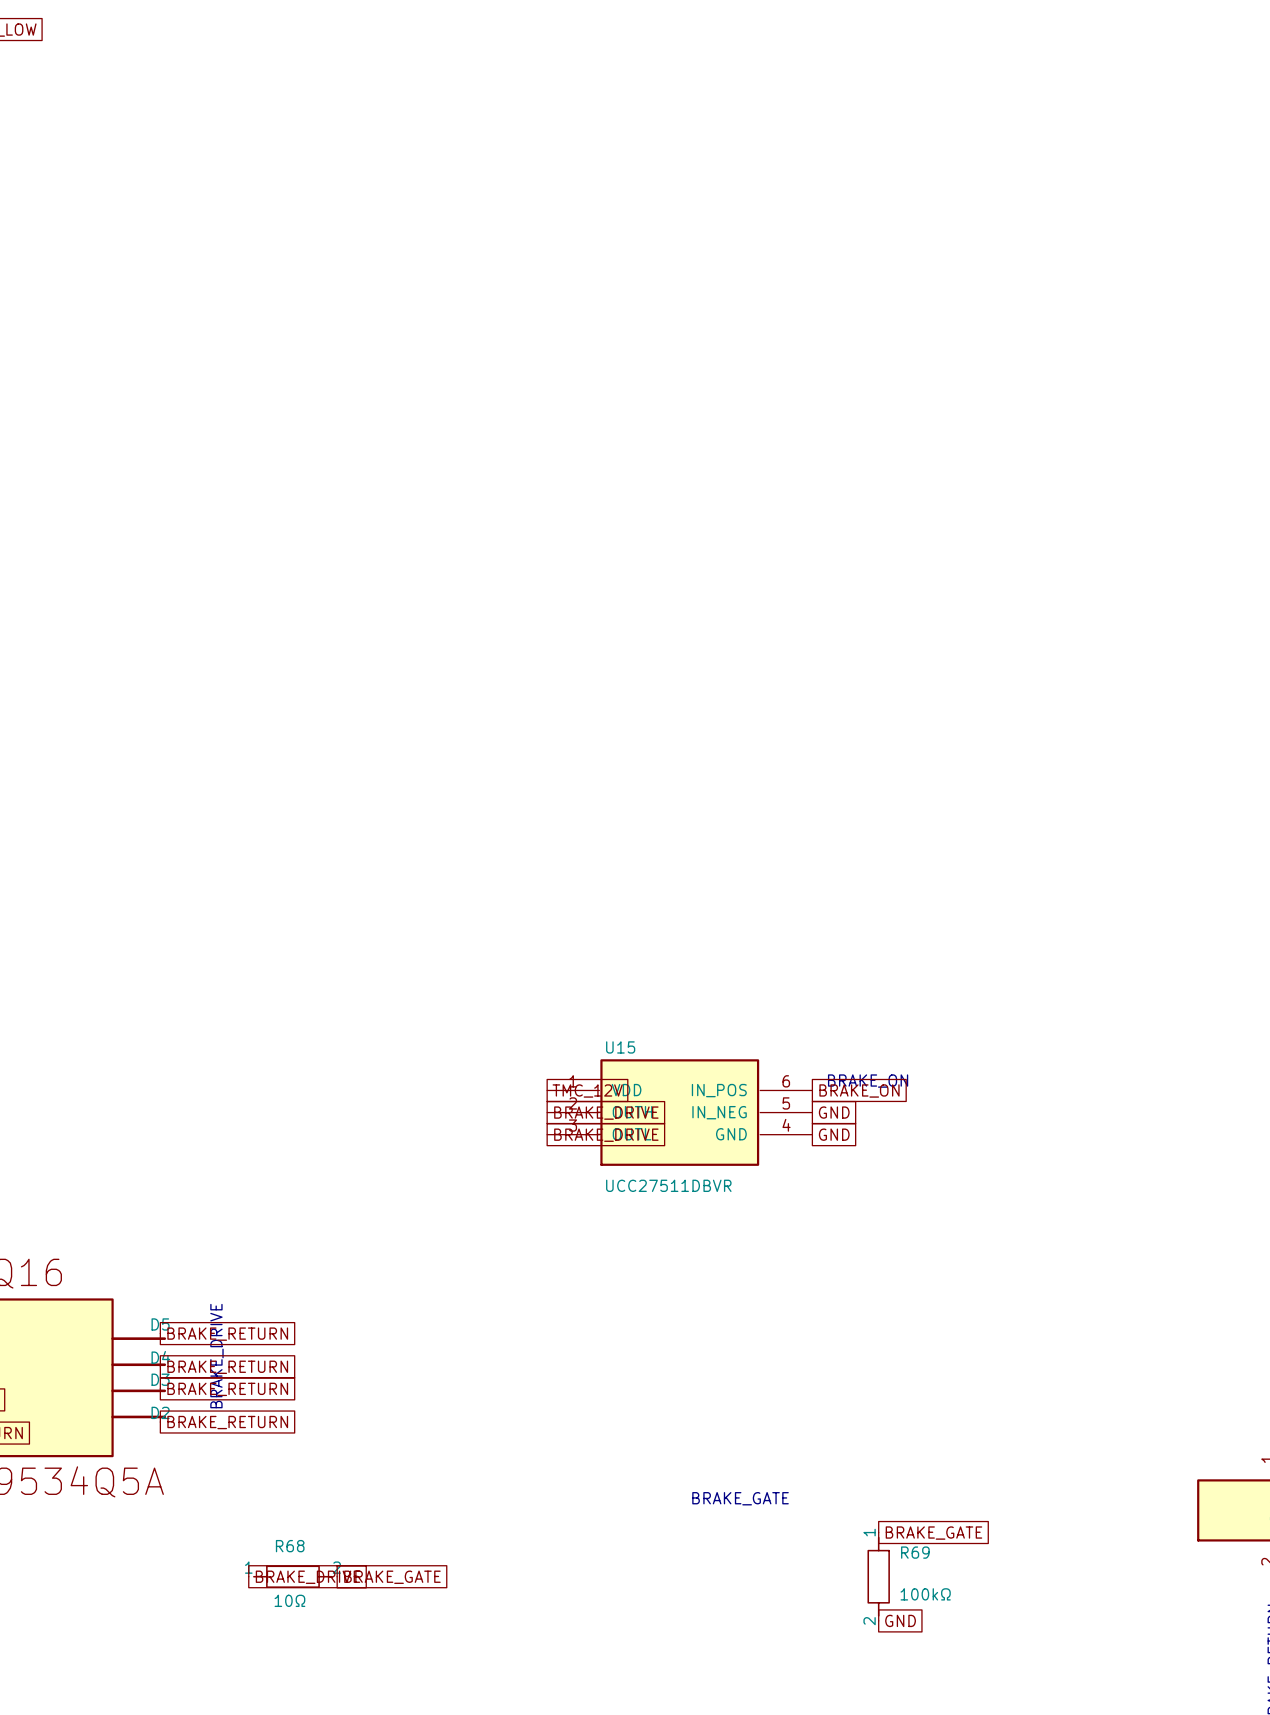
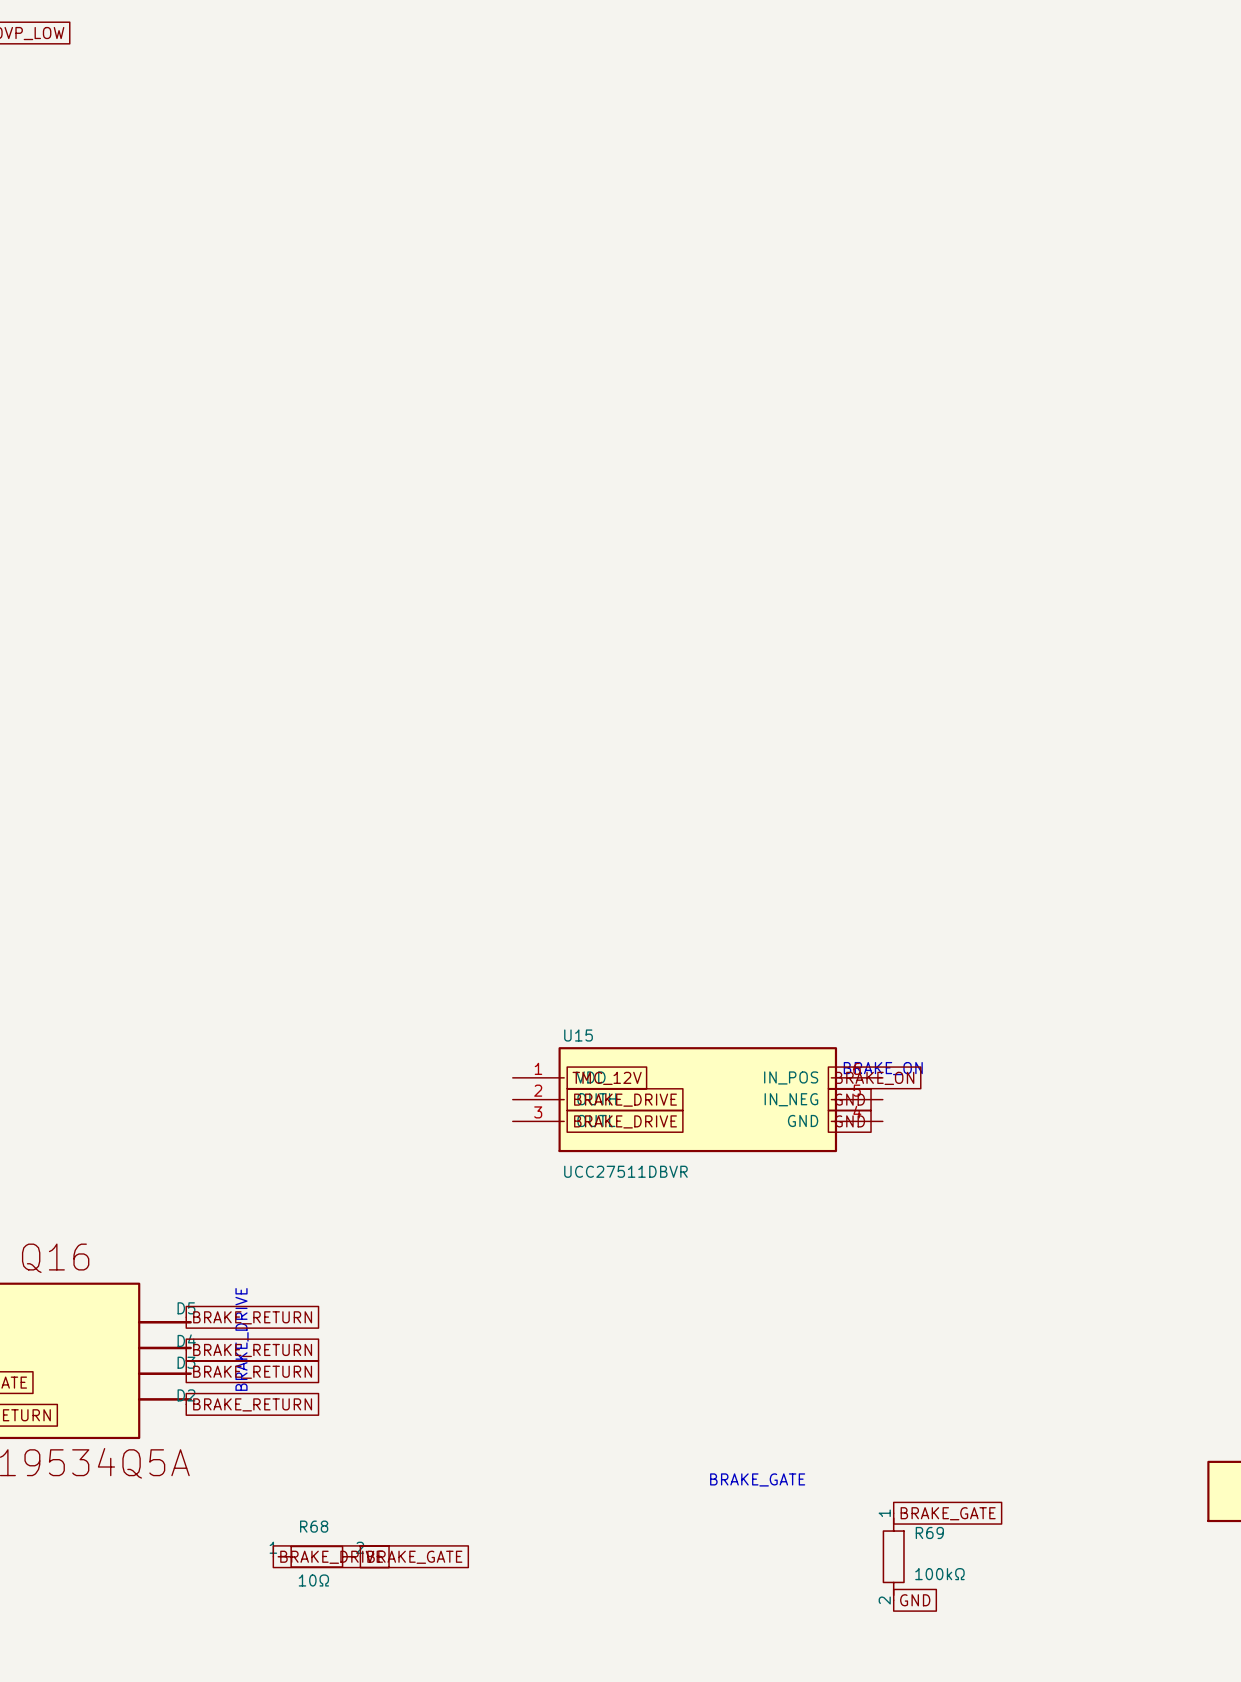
U15 name position: U15 (620, 1047) -> U15 (578, 1035)
U15 symbol: [547, 1059, 813, 1166] -> [512, 1047, 883, 1153]
U15 value position: UCC27511DBVR (668, 1185) -> UCC27511DBVR (625, 1171)

